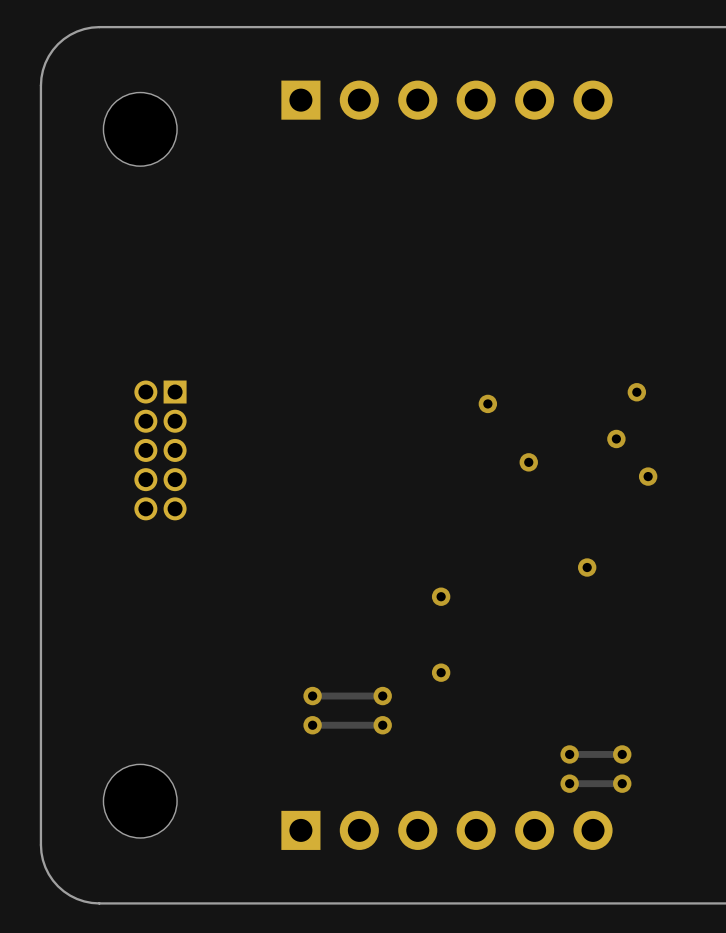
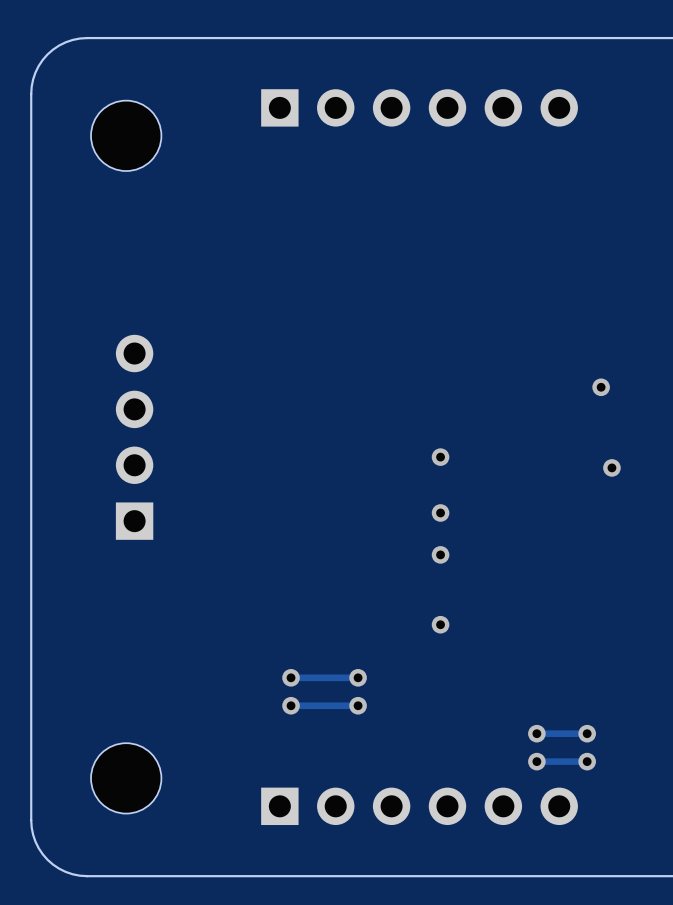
part footprint: [134, 380, 187, 521] -> [115, 334, 154, 540]
via: (487, 403) -> none
via: (616, 438) -> none
via: (528, 462) -> none
via: none -> (440, 457)
via: none -> (440, 512)
via: none -> (440, 554)
via: (587, 567) -> none
via: (441, 596) -> none
via: none -> (440, 624)
via: (441, 672) -> none

